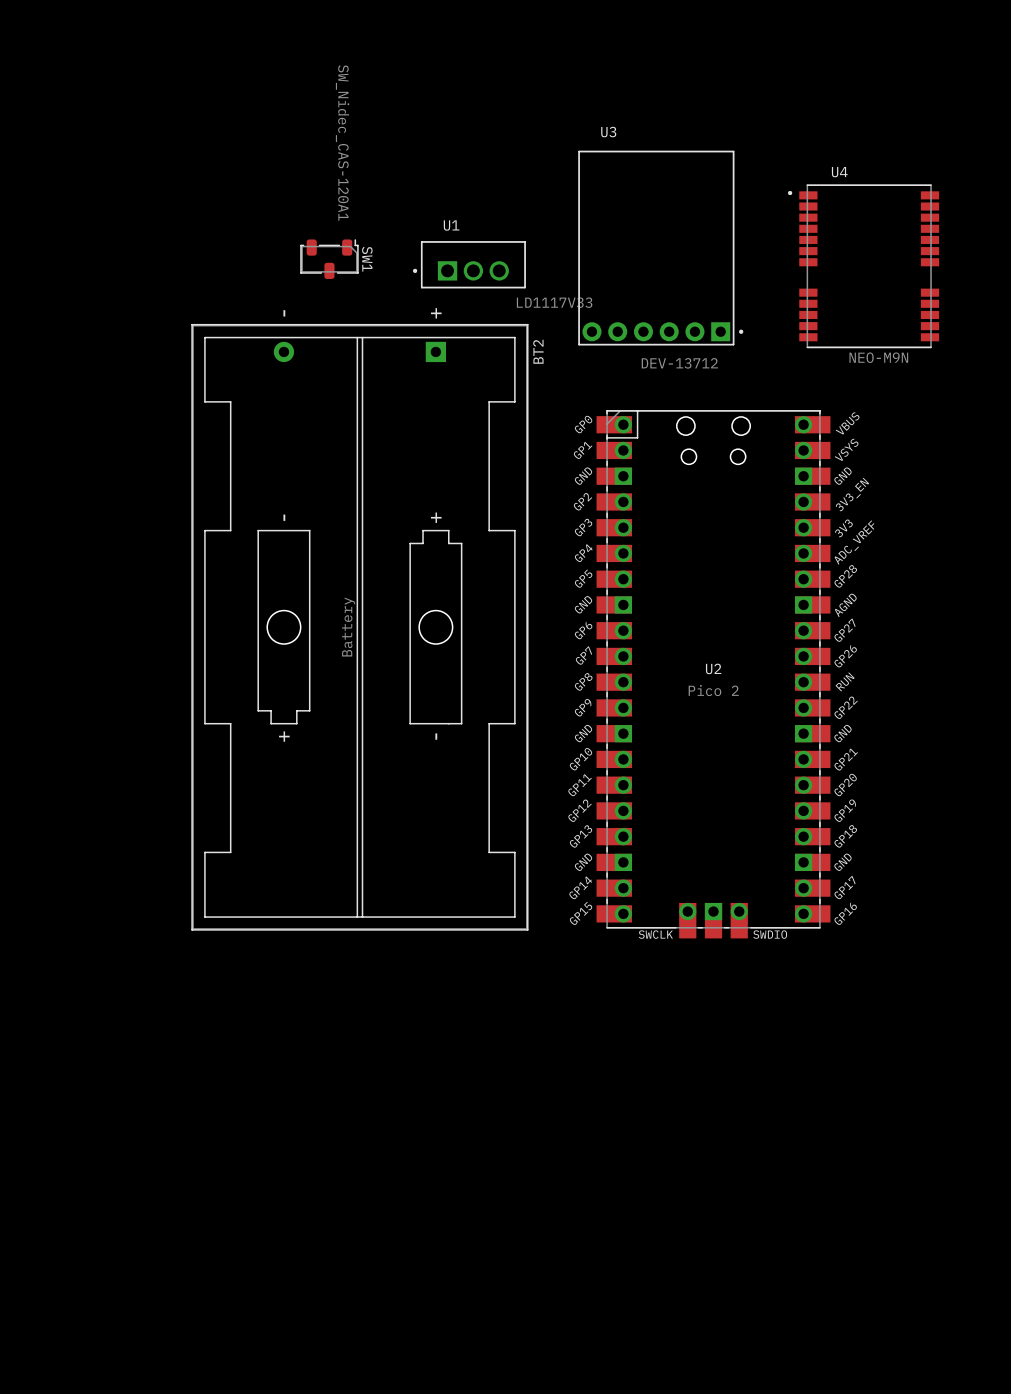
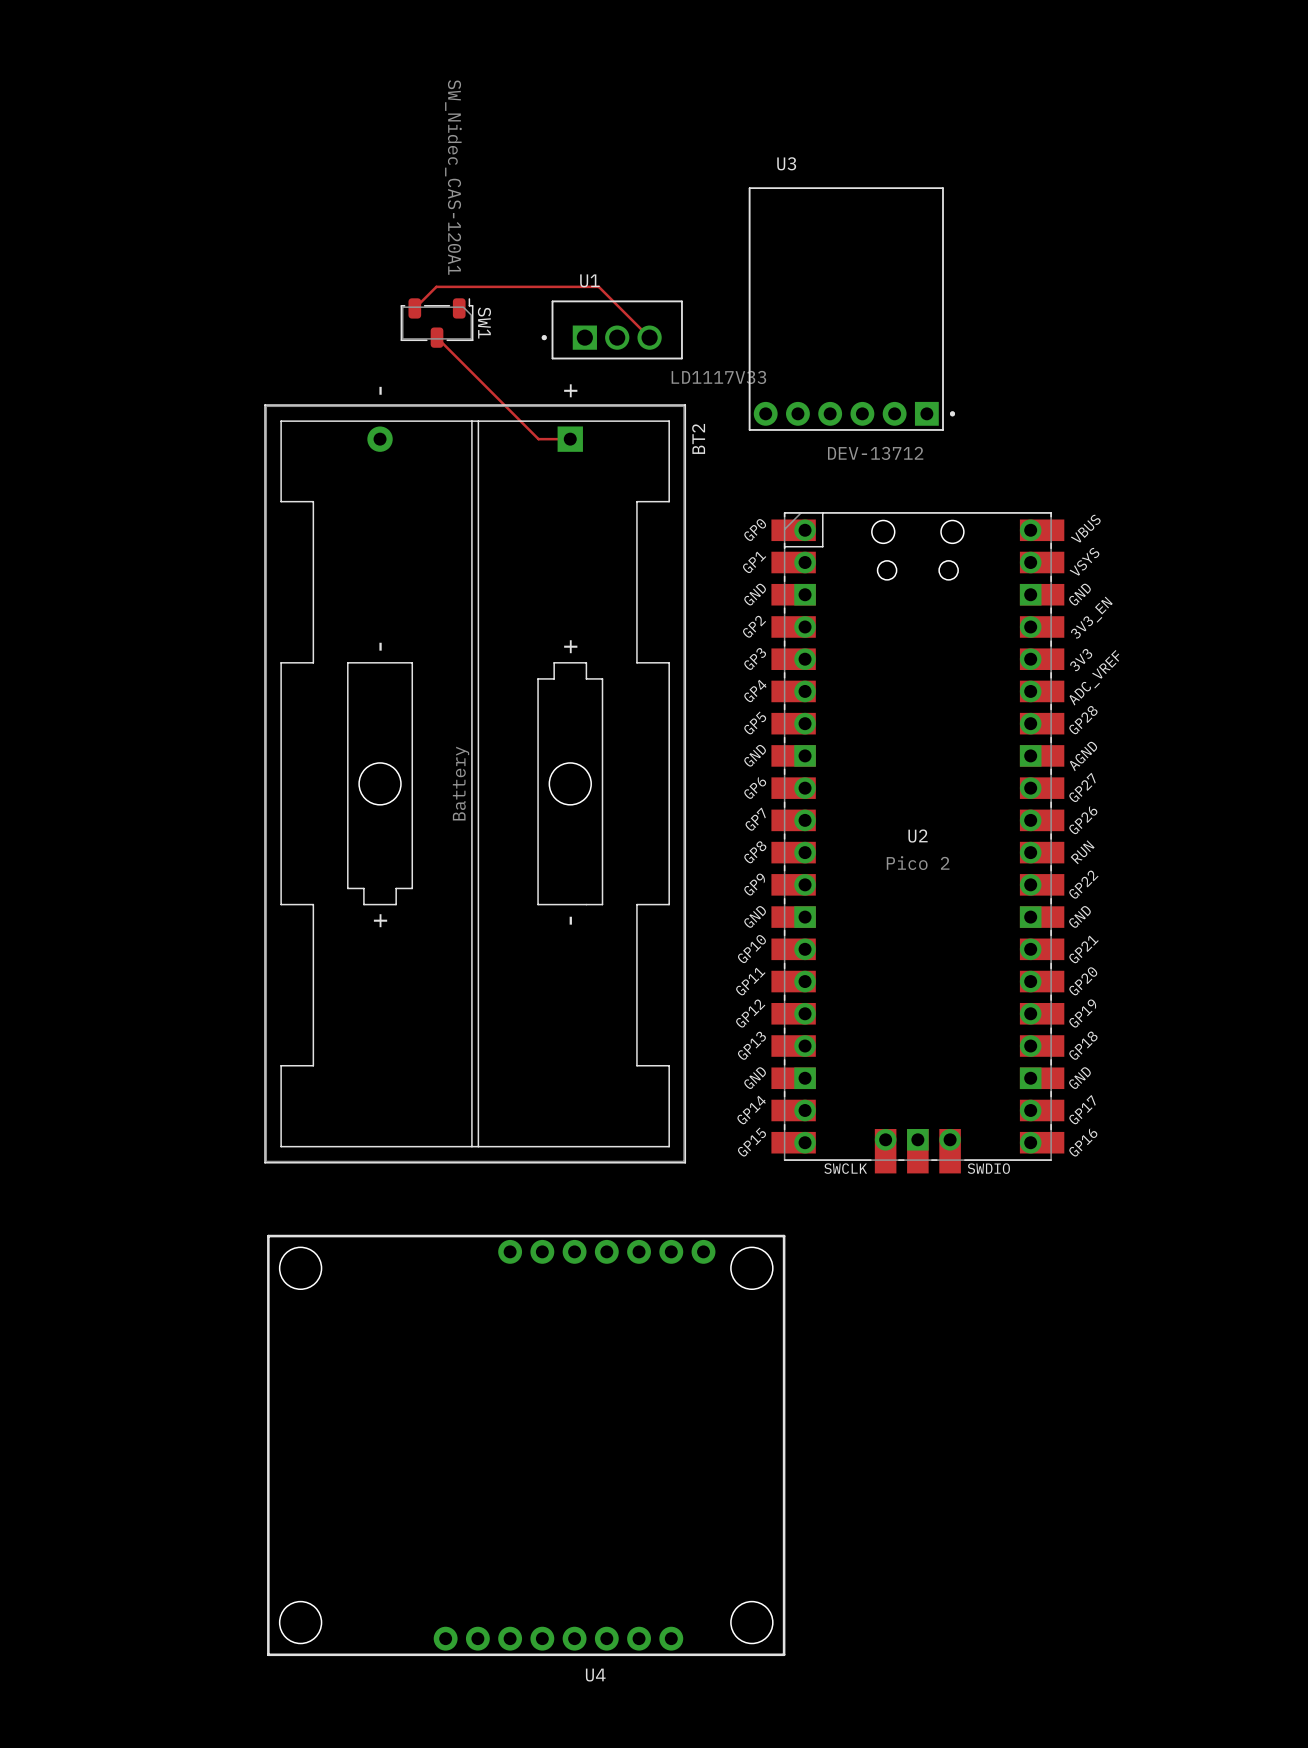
U4 name position: U4 (839, 172) -> U4 (595, 1675)
U4 footprint: [788, 184, 940, 349] -> [267, 1234, 786, 1657]
track: none -> (414, 308) (436, 286) (598, 286) (649, 337)
track: none -> (437, 337) (538, 439) (570, 439)
U4 value: NEO-M9N (878, 357) -> none

